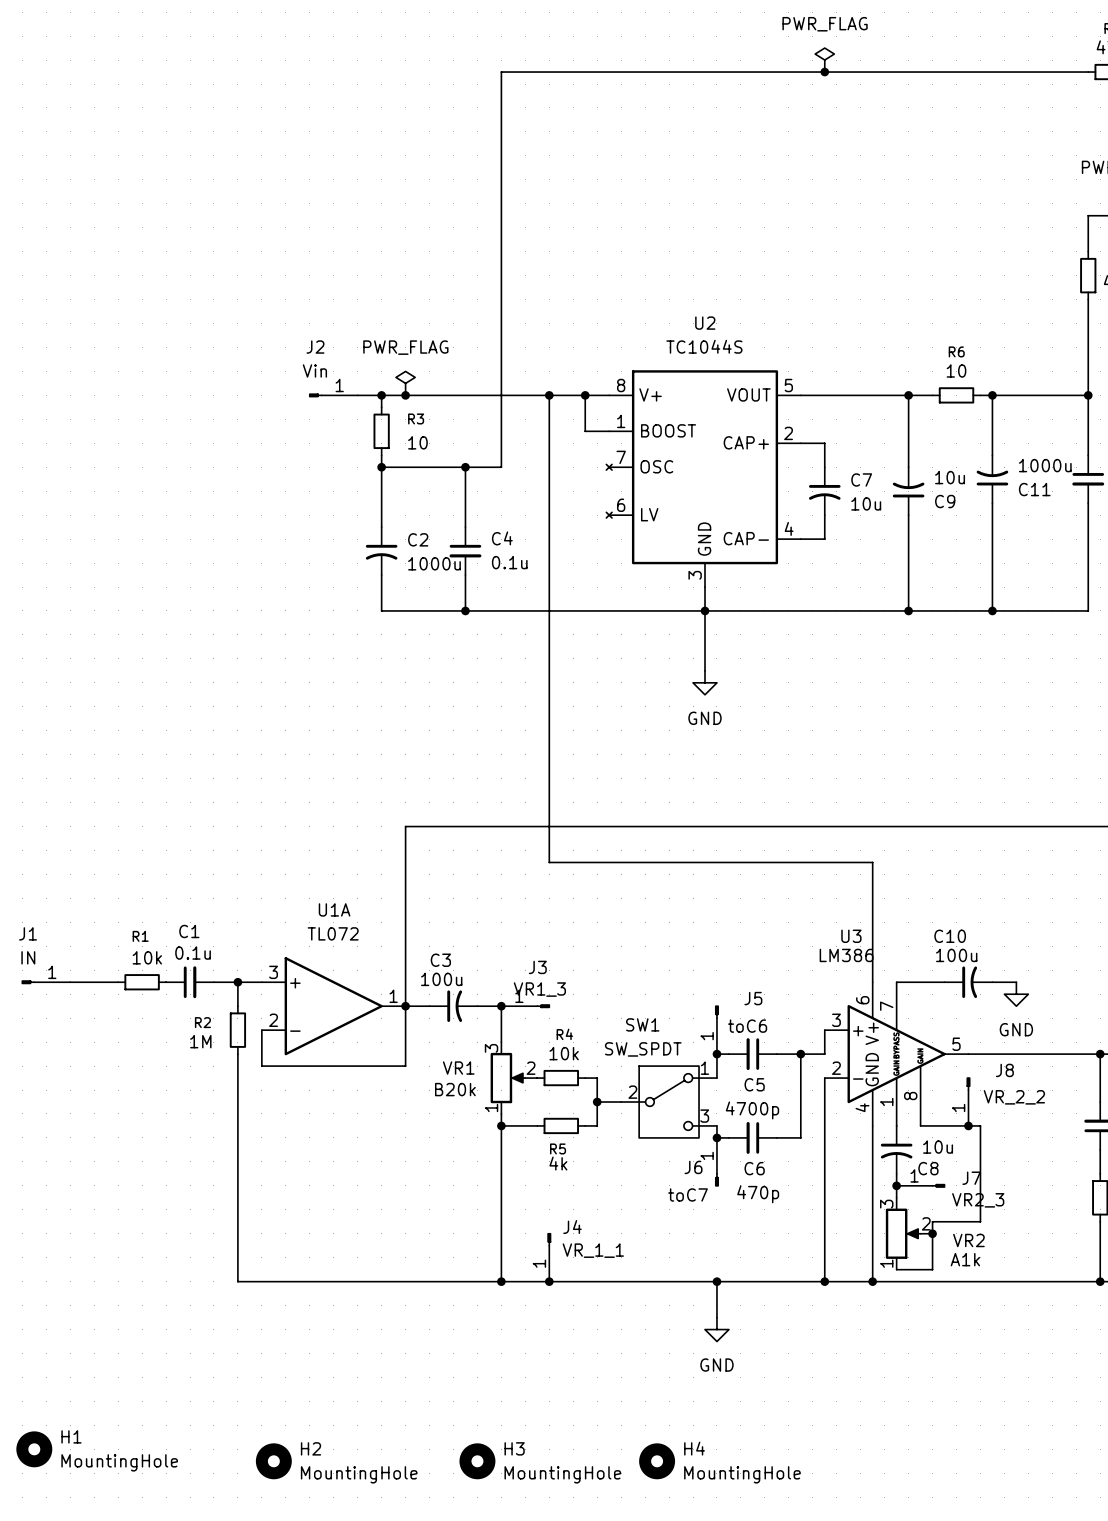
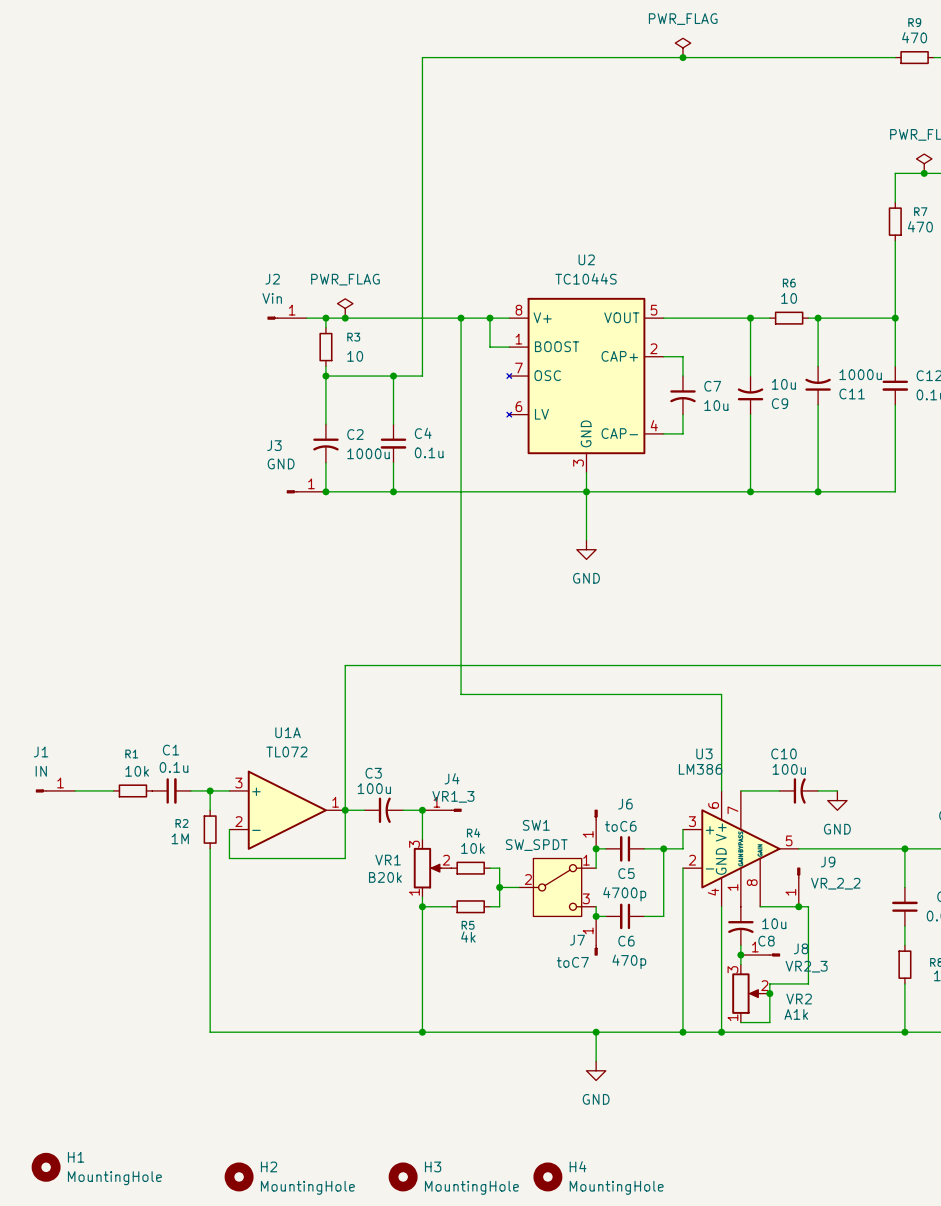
J3: none -> GND (306, 491)
junction: none -> (325, 491)
J3 name: J3 (537, 967) -> J4 (452, 778)
J5 name: J5 (753, 998) -> J6 (625, 804)
J8 name: J8 (1004, 1070) -> J9 (828, 862)
J6 name: J6 (693, 1167) -> J7 (577, 940)
J7 name: J7 (971, 1178) -> J8 (801, 948)
J4: VR_1_1 (549, 1257) -> none
junction: (549, 1281) -> none

